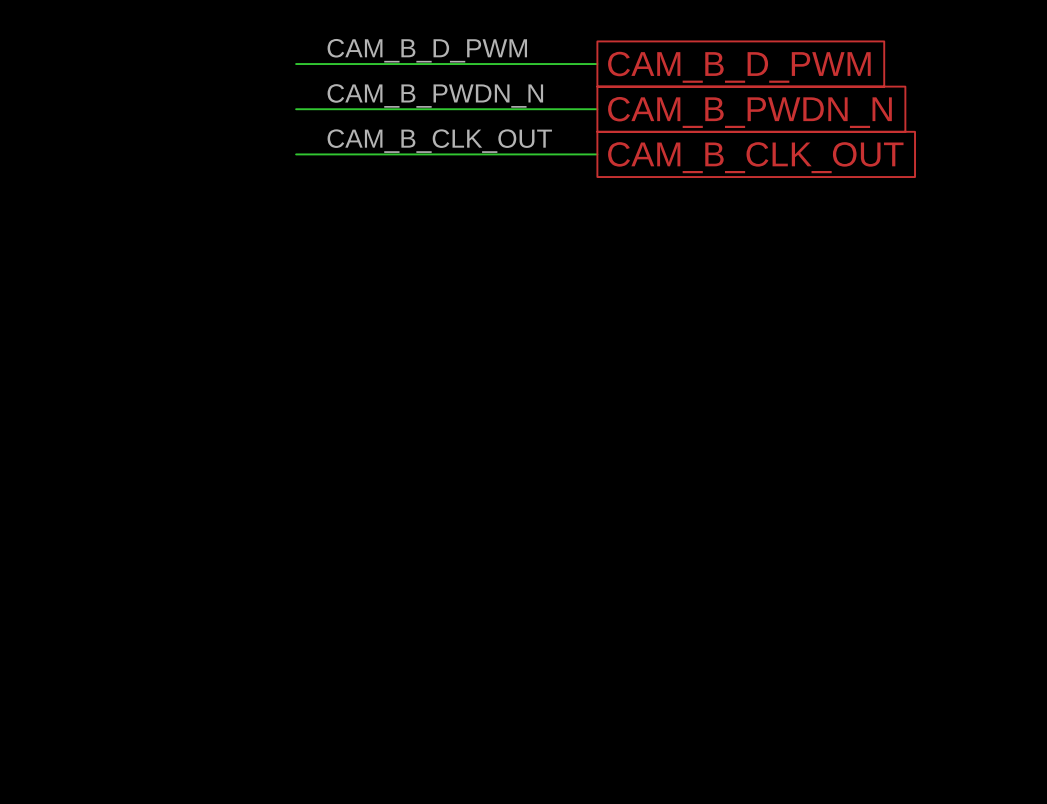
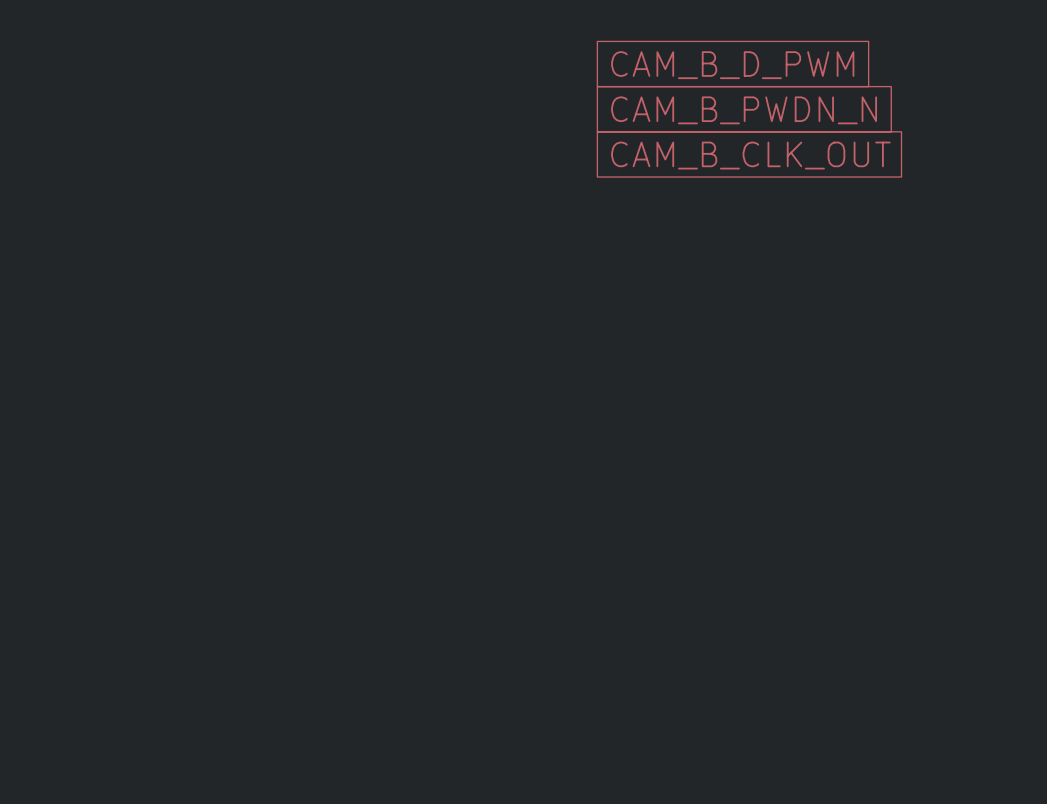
label: CAM_B_D_PWM (427, 50) -> none
wire: (296, 64) (597, 64) -> none
label: CAM_B_PWDN_N (435, 95) -> none
wire: (296, 109) (597, 109) -> none
label: CAM_B_CLK_OUT (439, 141) -> none
wire: (296, 154) (597, 154) -> none

